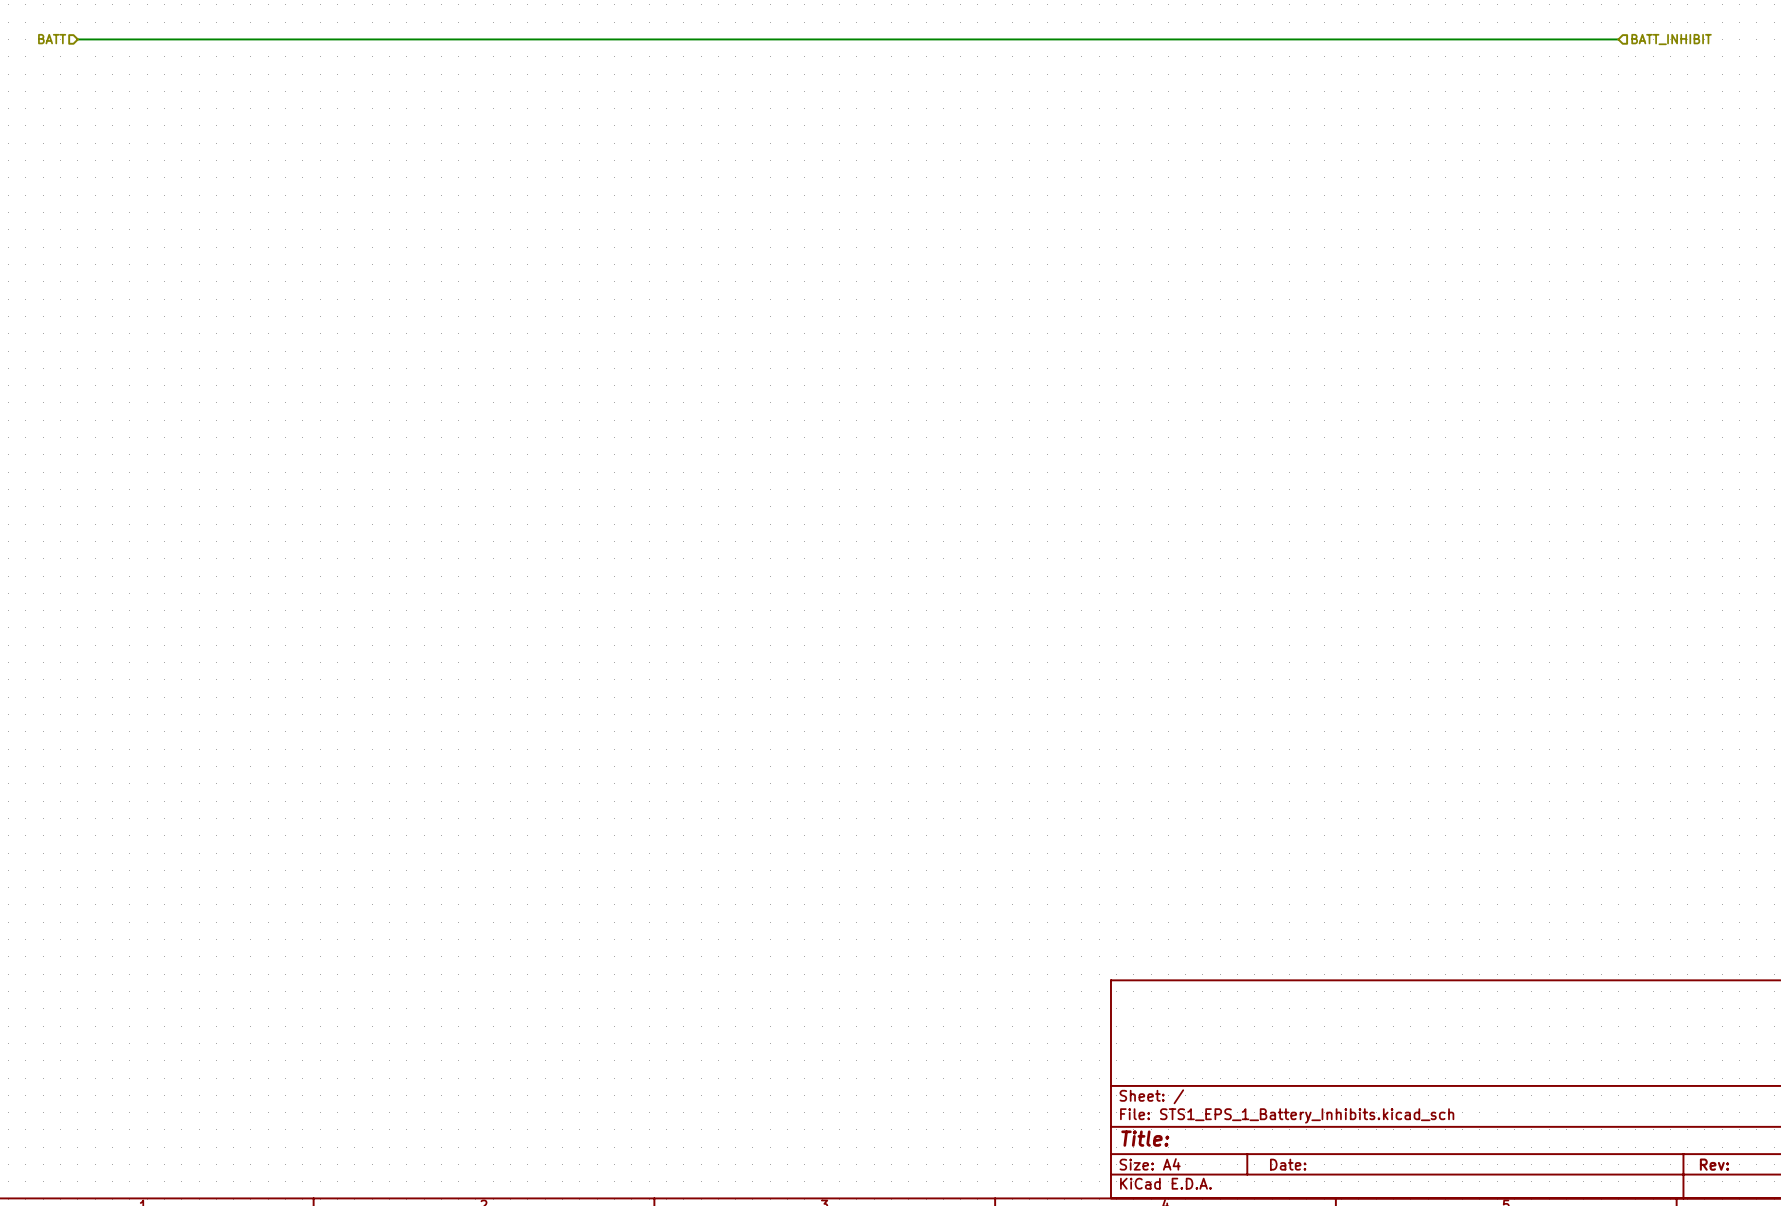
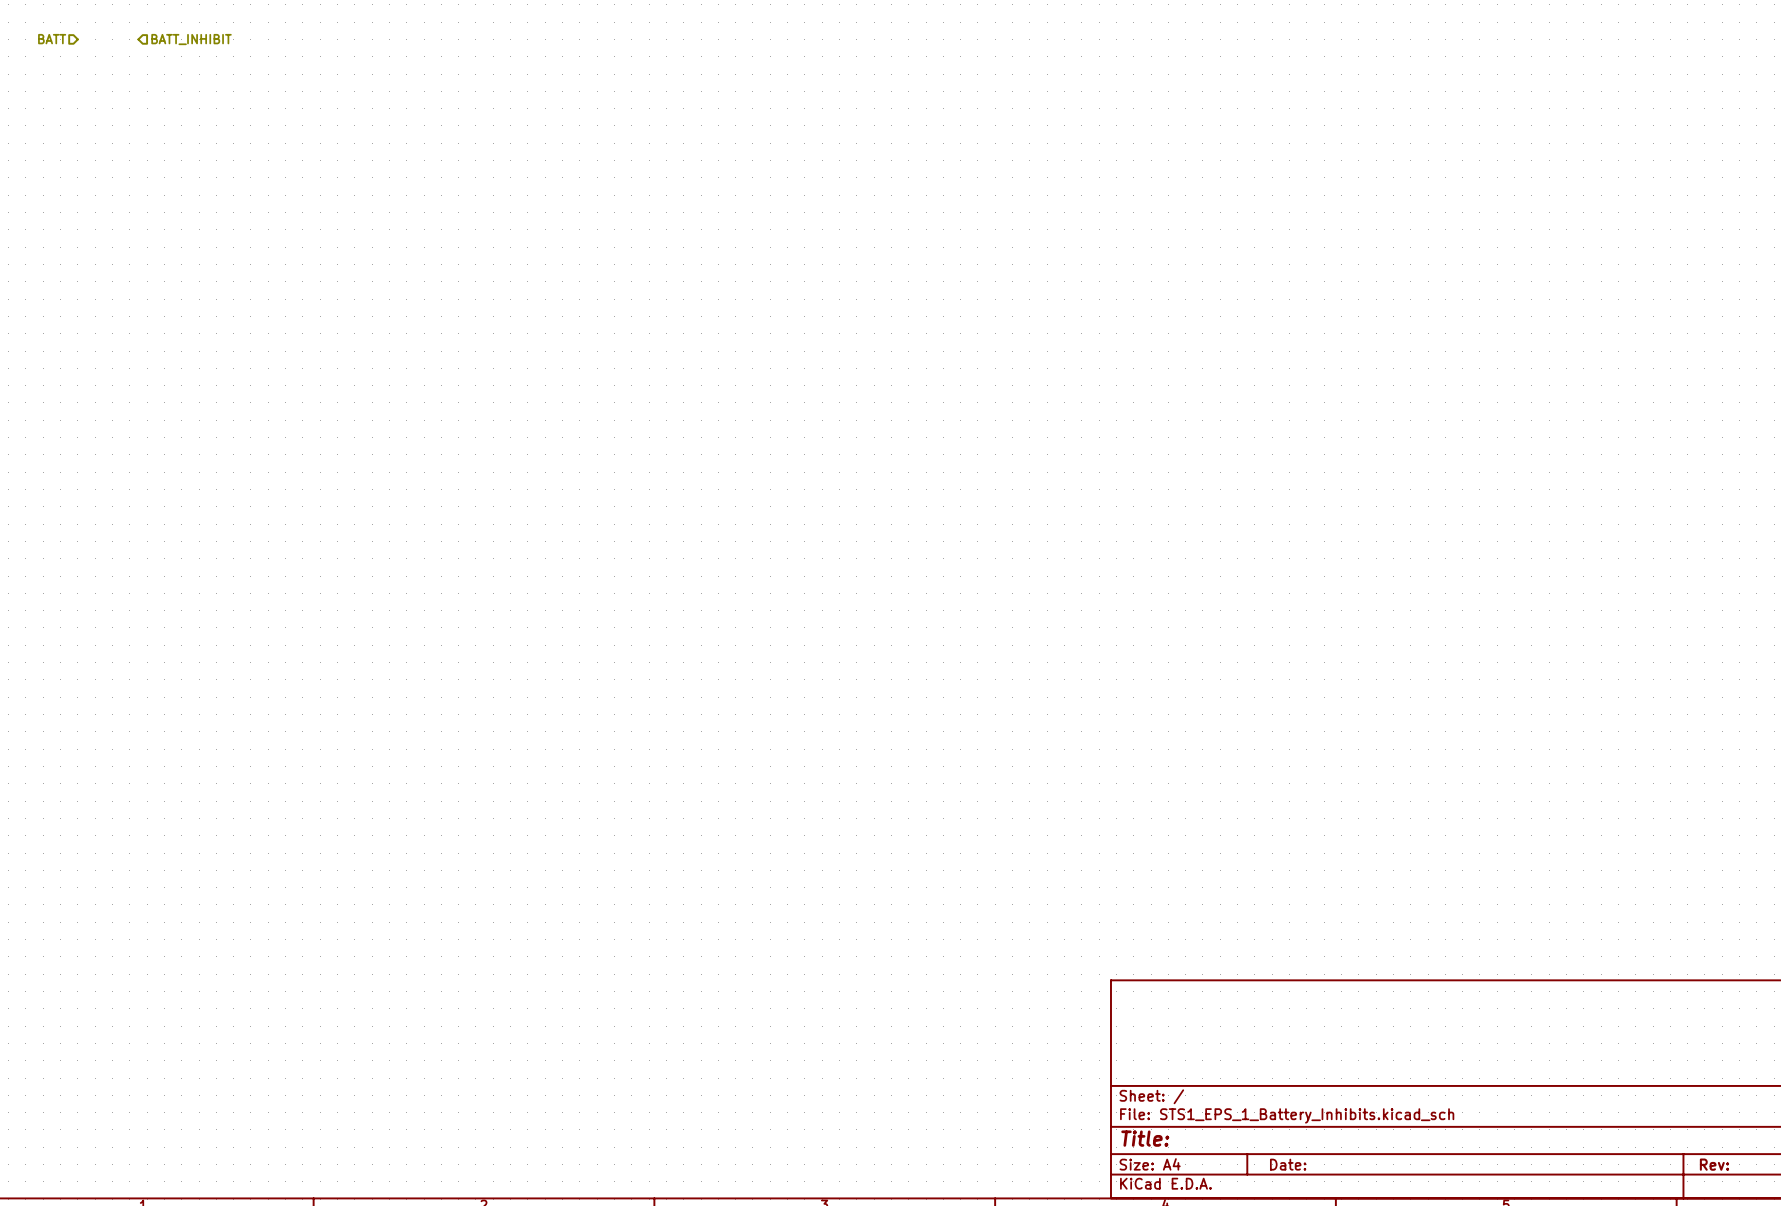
wire: (77, 39) (1618, 39) -> none
hierarchical label: none -> BATT_INHIBIT (191, 39)
hierarchical label: BATT_INHIBIT (1671, 39) -> none

